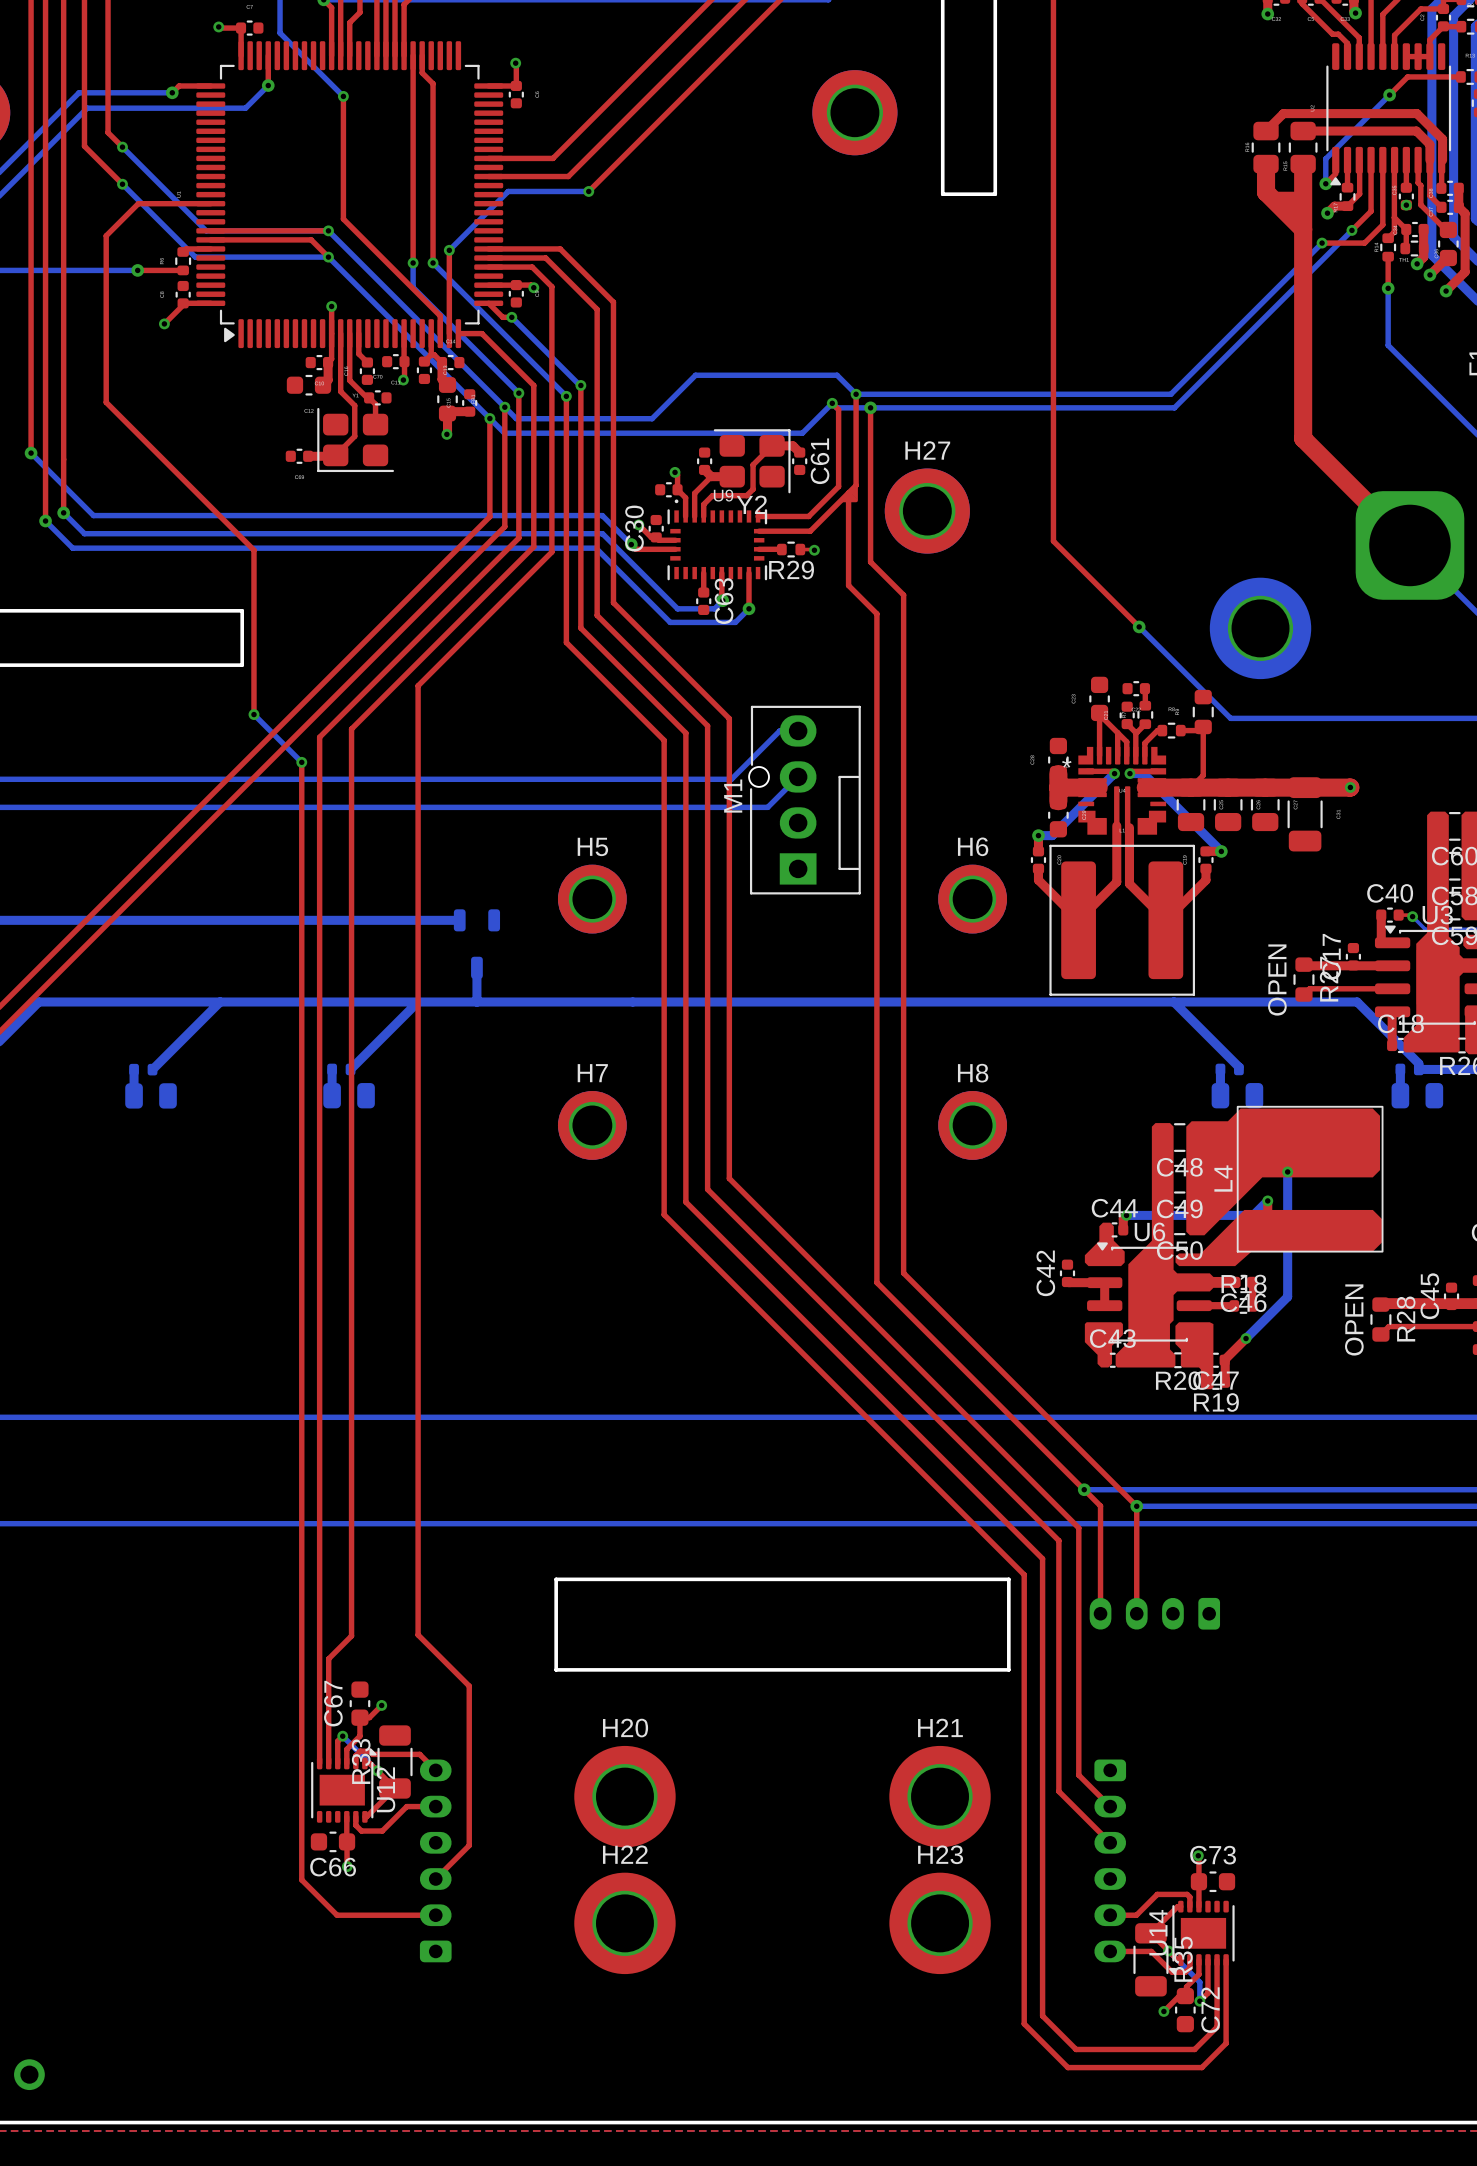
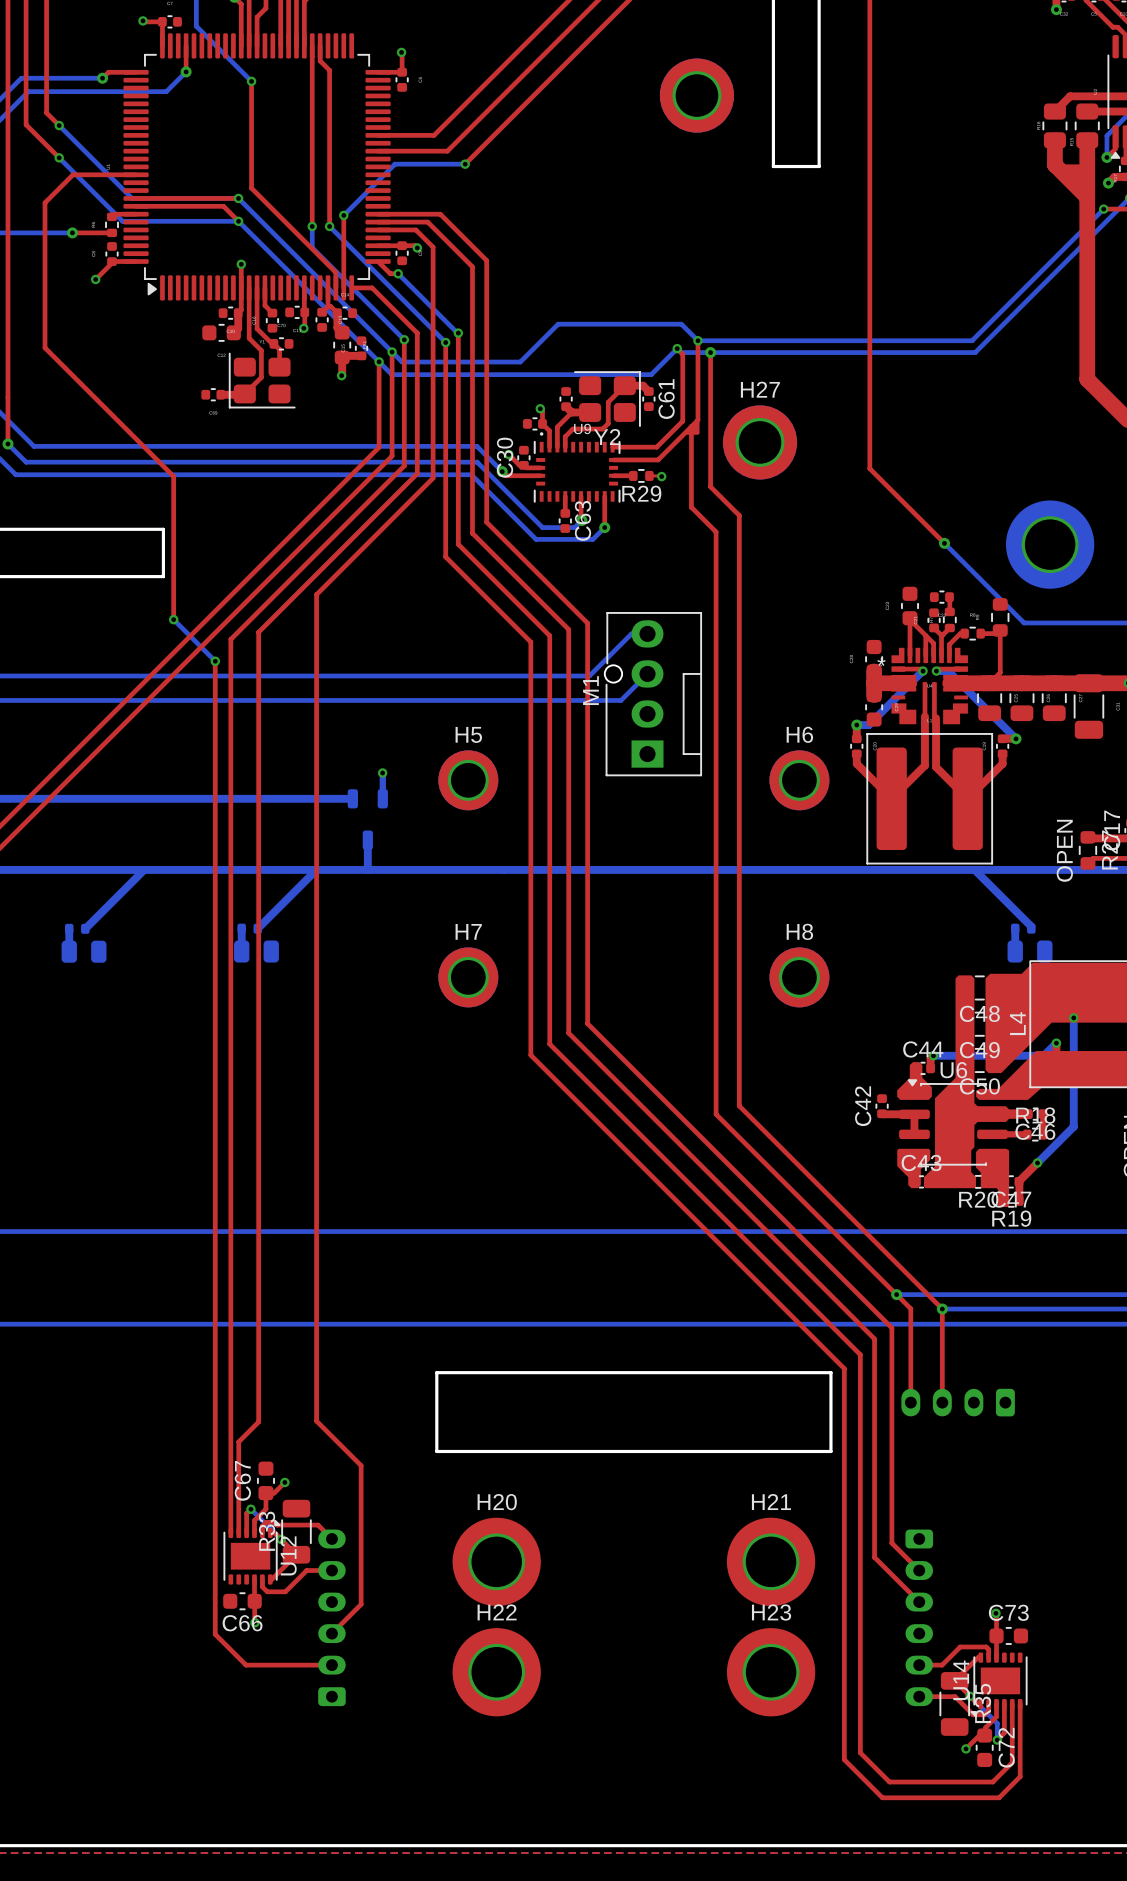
via: none -> (382, 772)
bottom track: none -> (382, 773) (382, 798)

